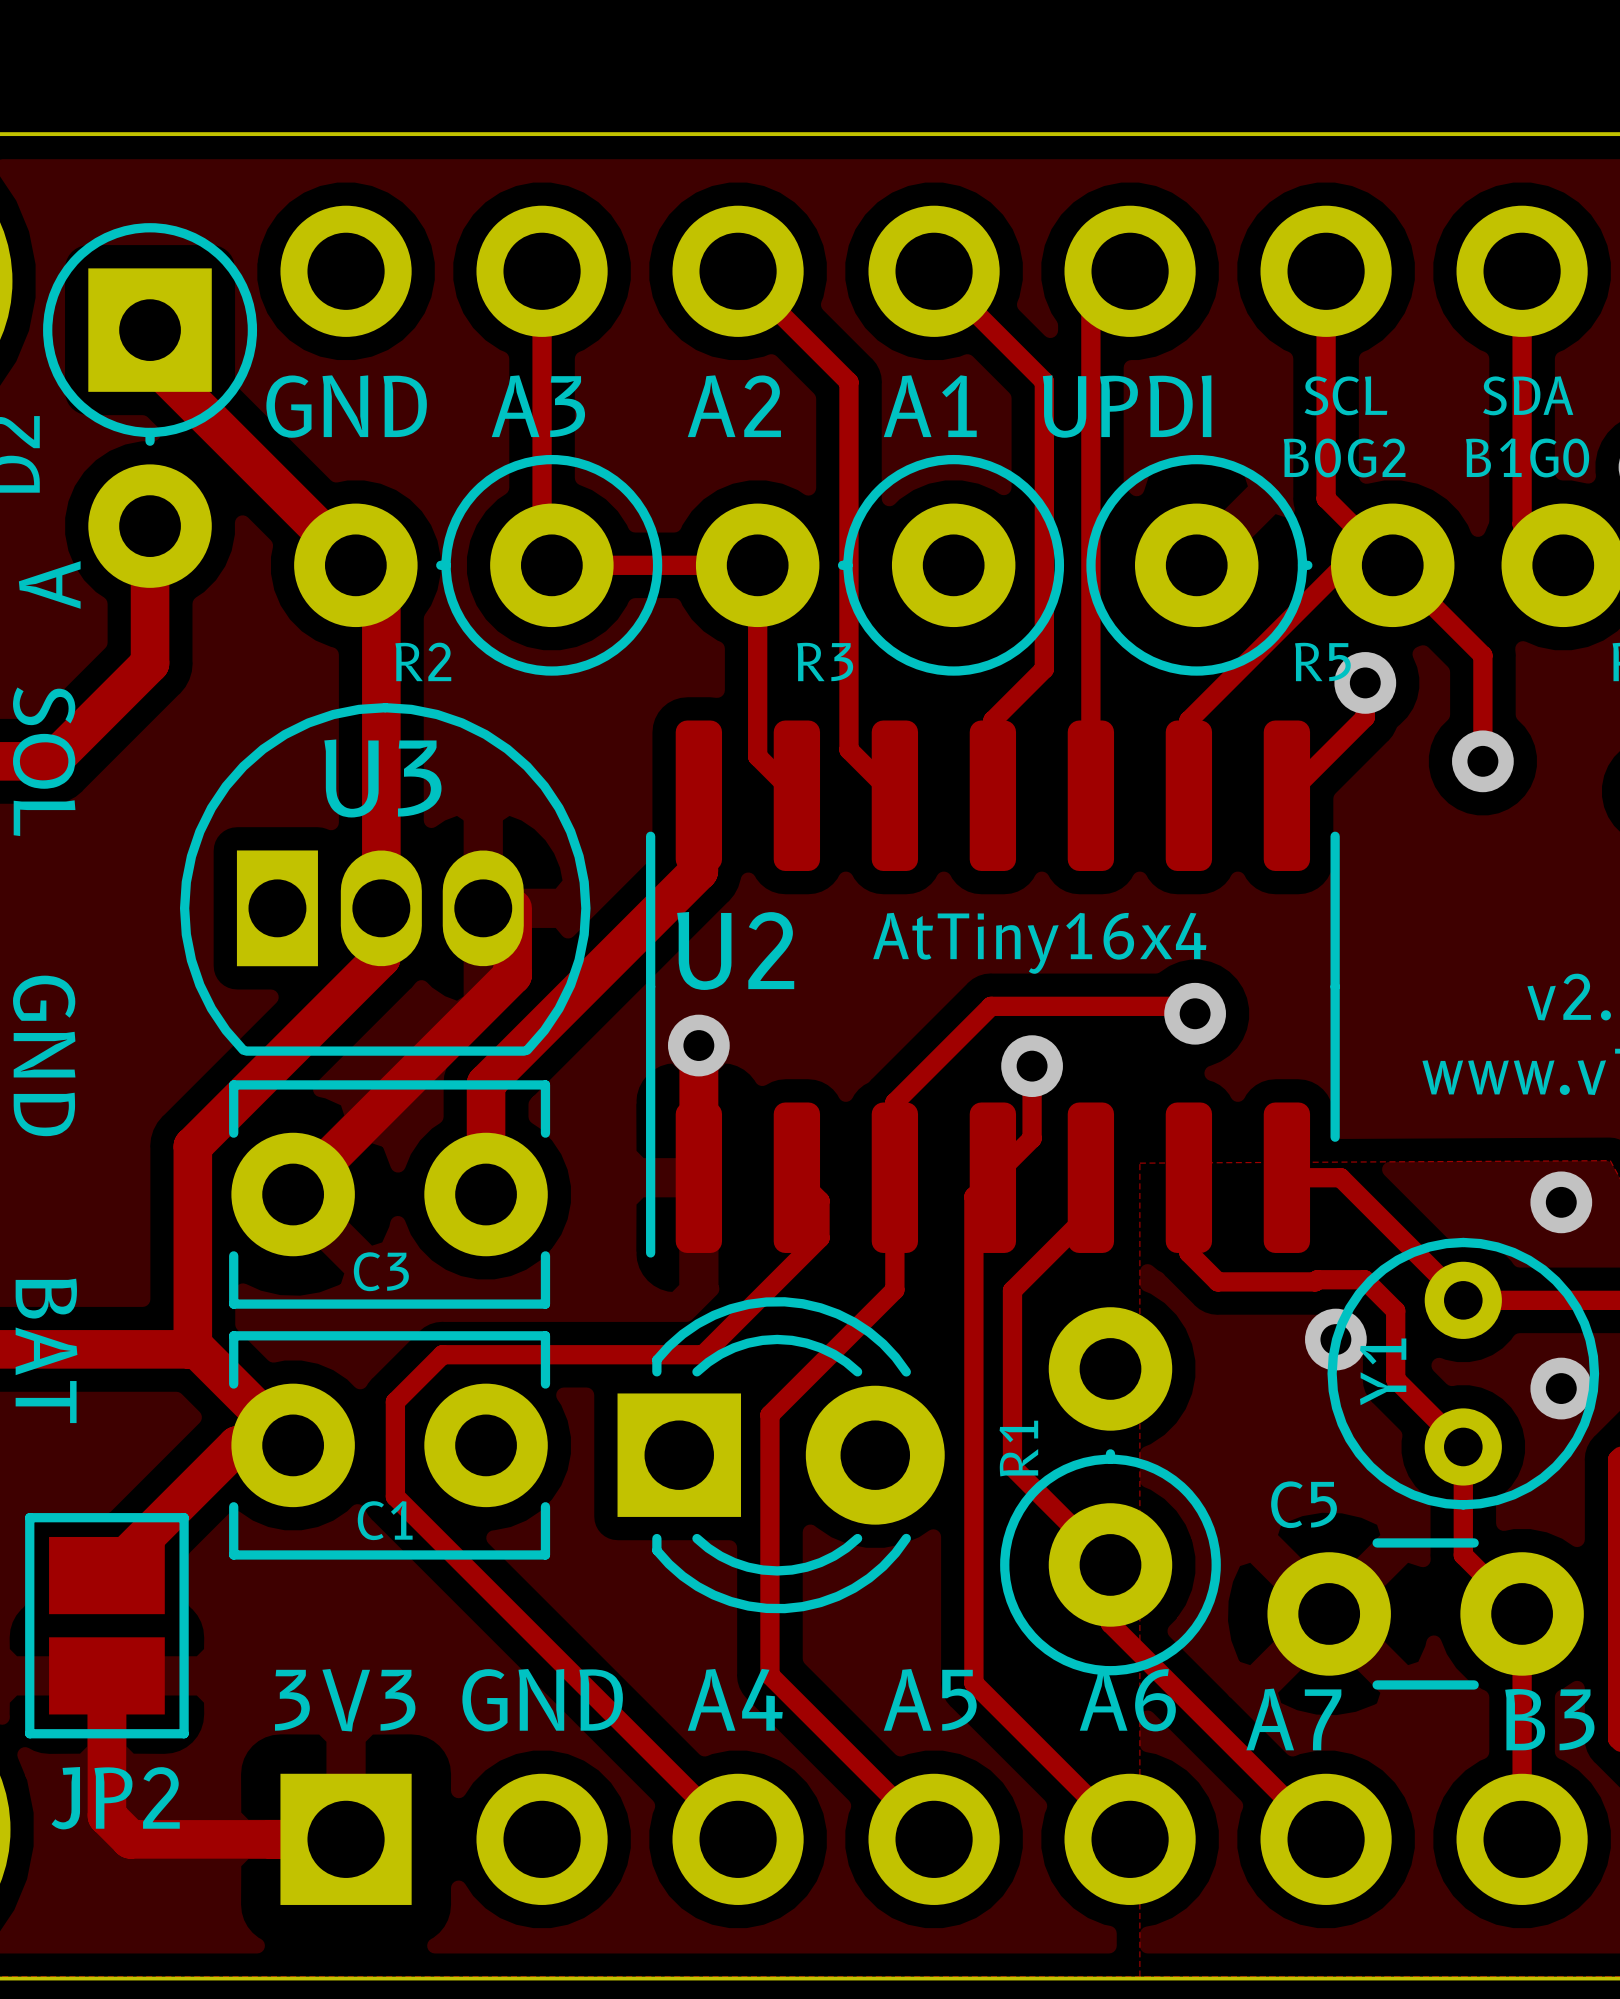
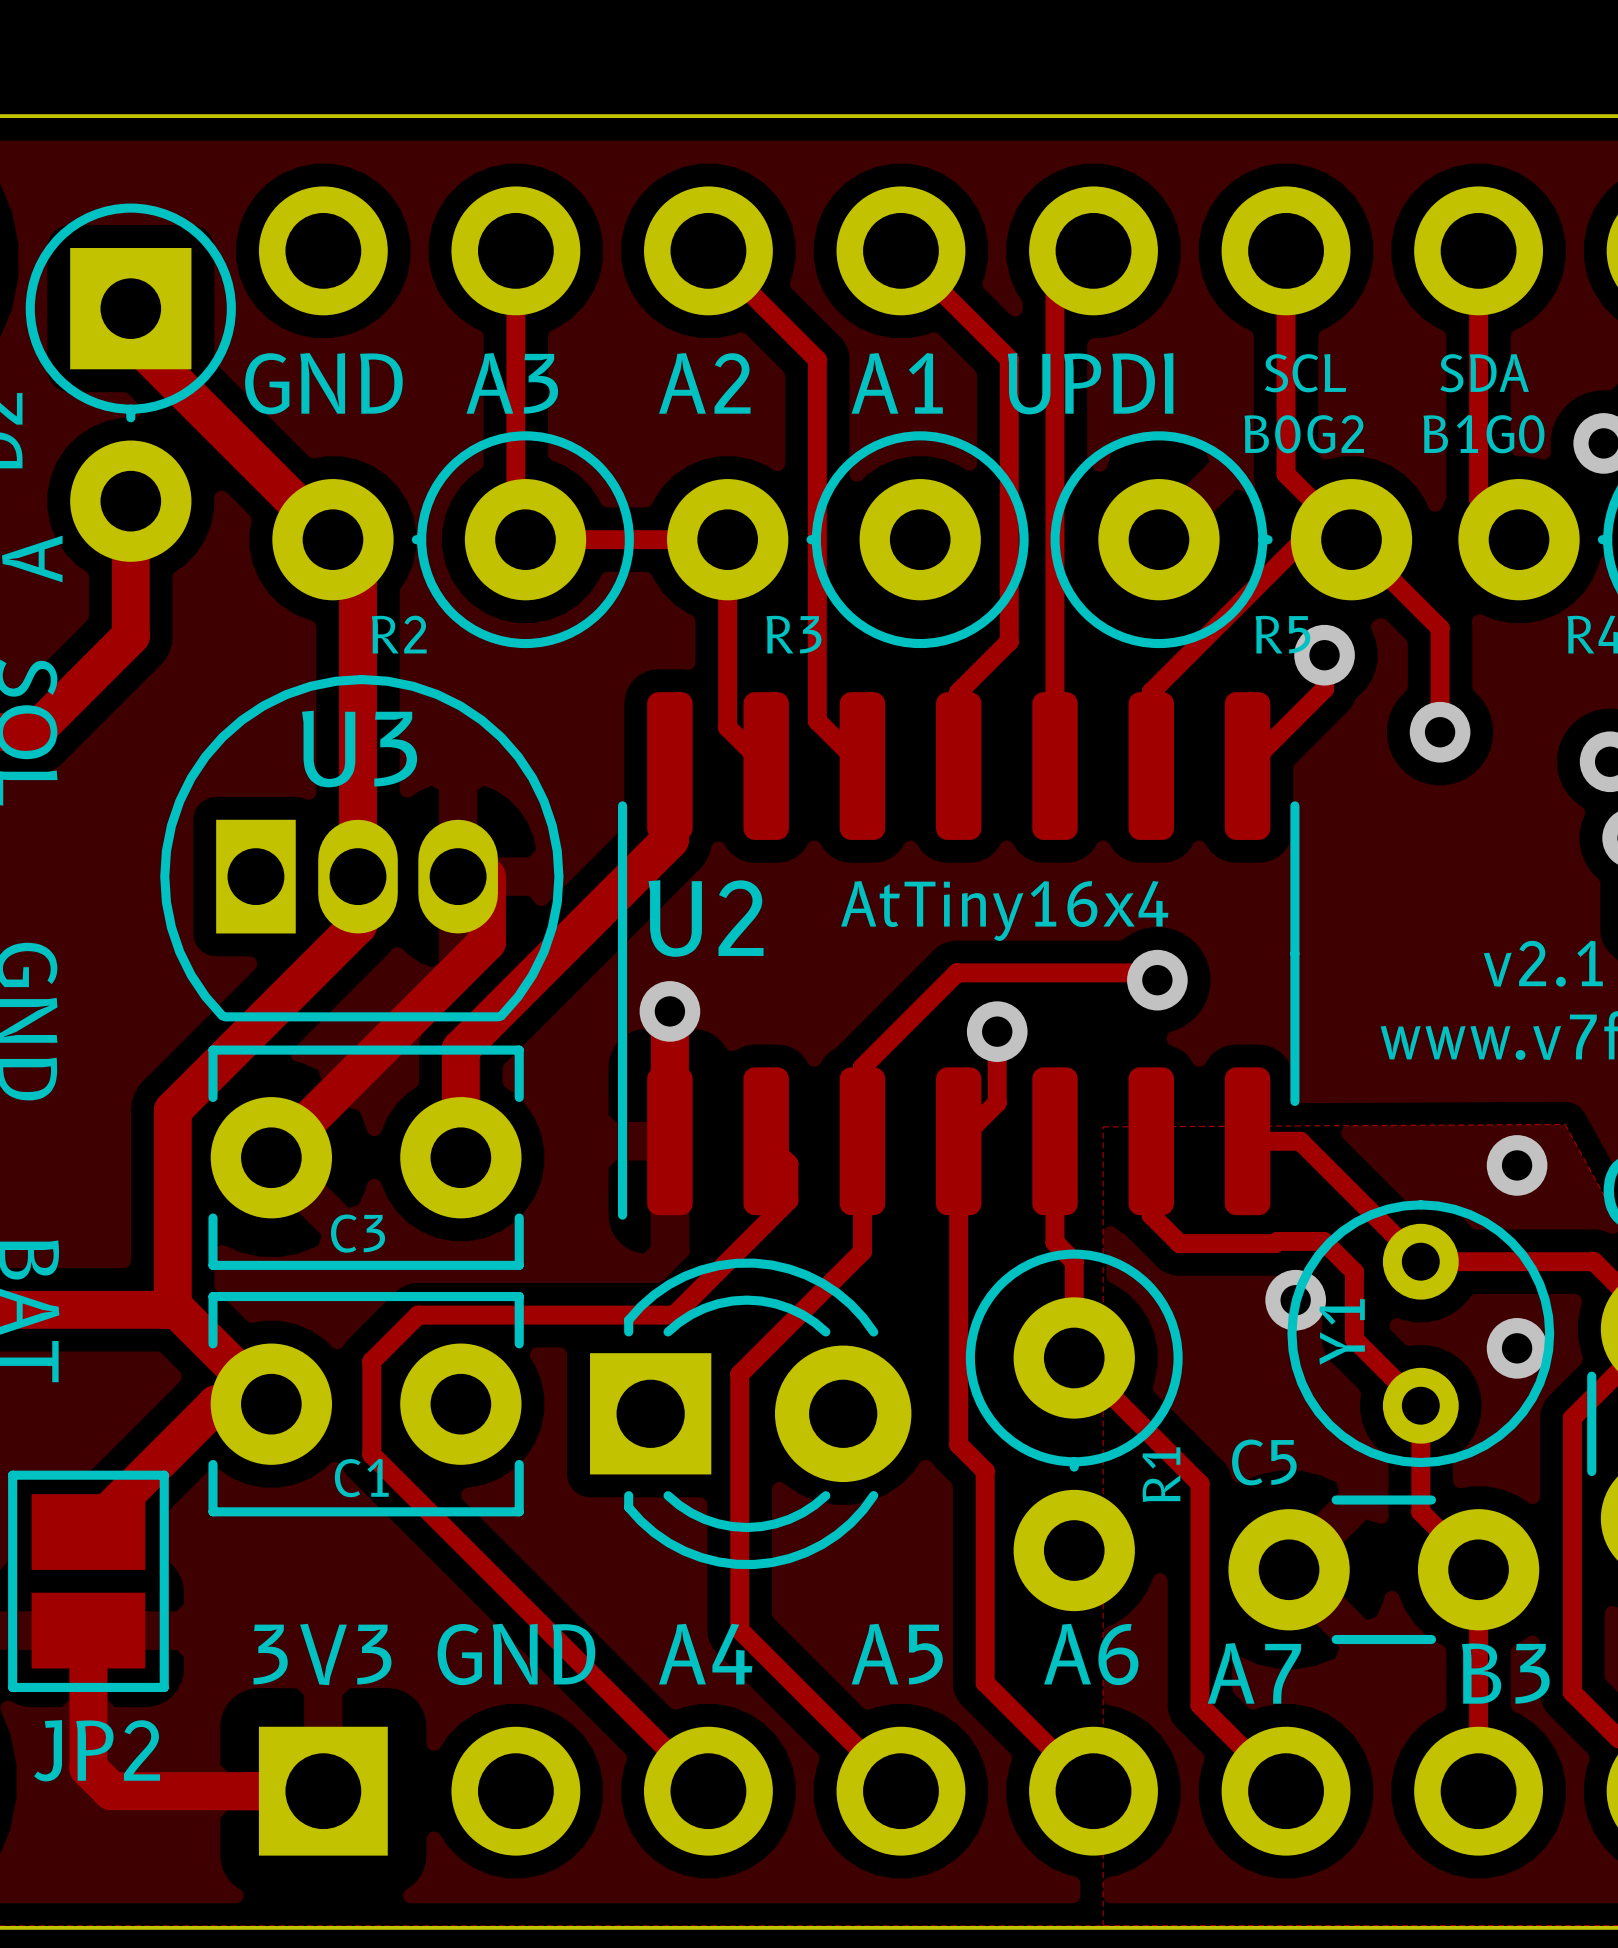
track: (992, 1177) (973, 1196) (973, 1683) (1019, 1729) -> (958, 1175) (958, 1444) (985, 1471) (985, 1682)
track: (1090, 1212) (1012, 1290) (1012, 1466) (1110, 1564) -> none
R1 rotation: 0° (1110, 1491) -> 180° (1074, 1430)
track: (1110, 1623) (1238, 1751) -> (1054, 1180) (1054, 1242) (1074, 1261) (1074, 1357) (1200, 1483) (1200, 1705)

